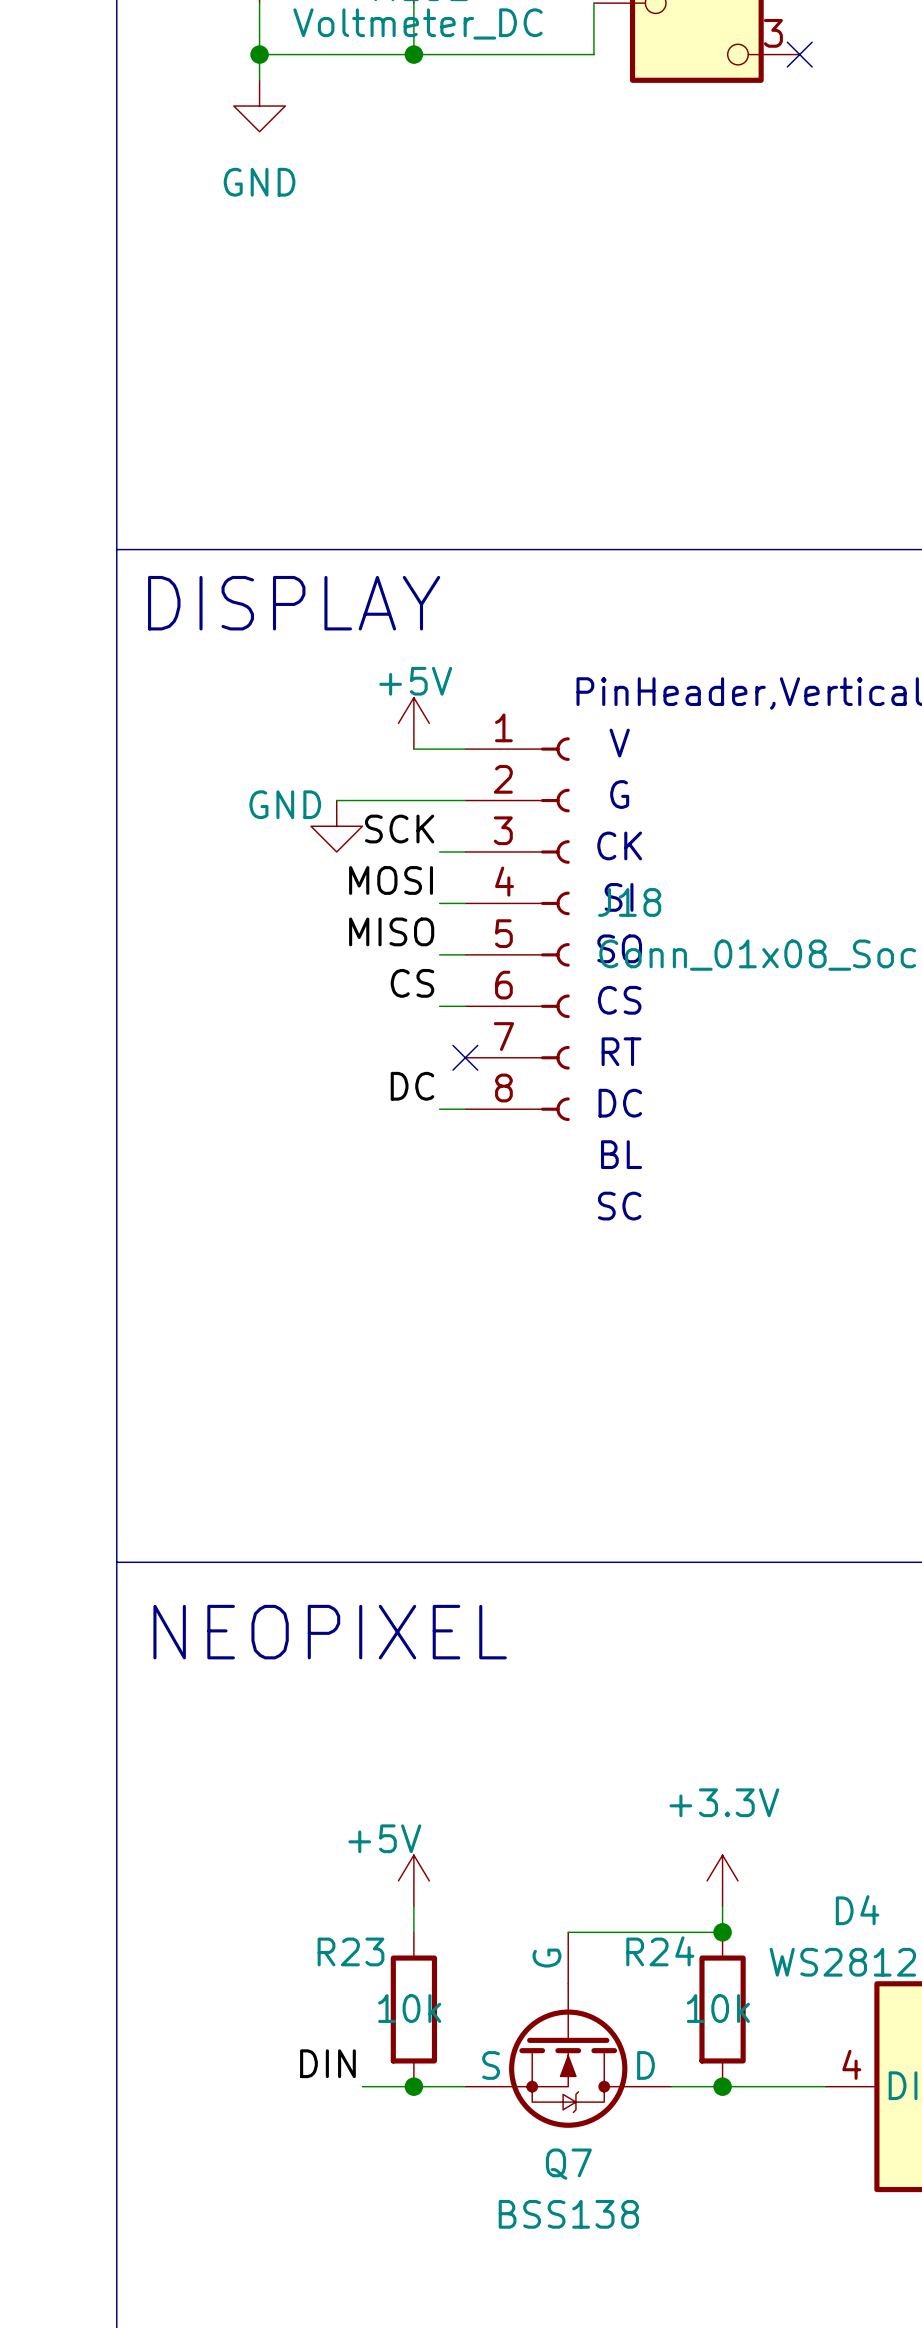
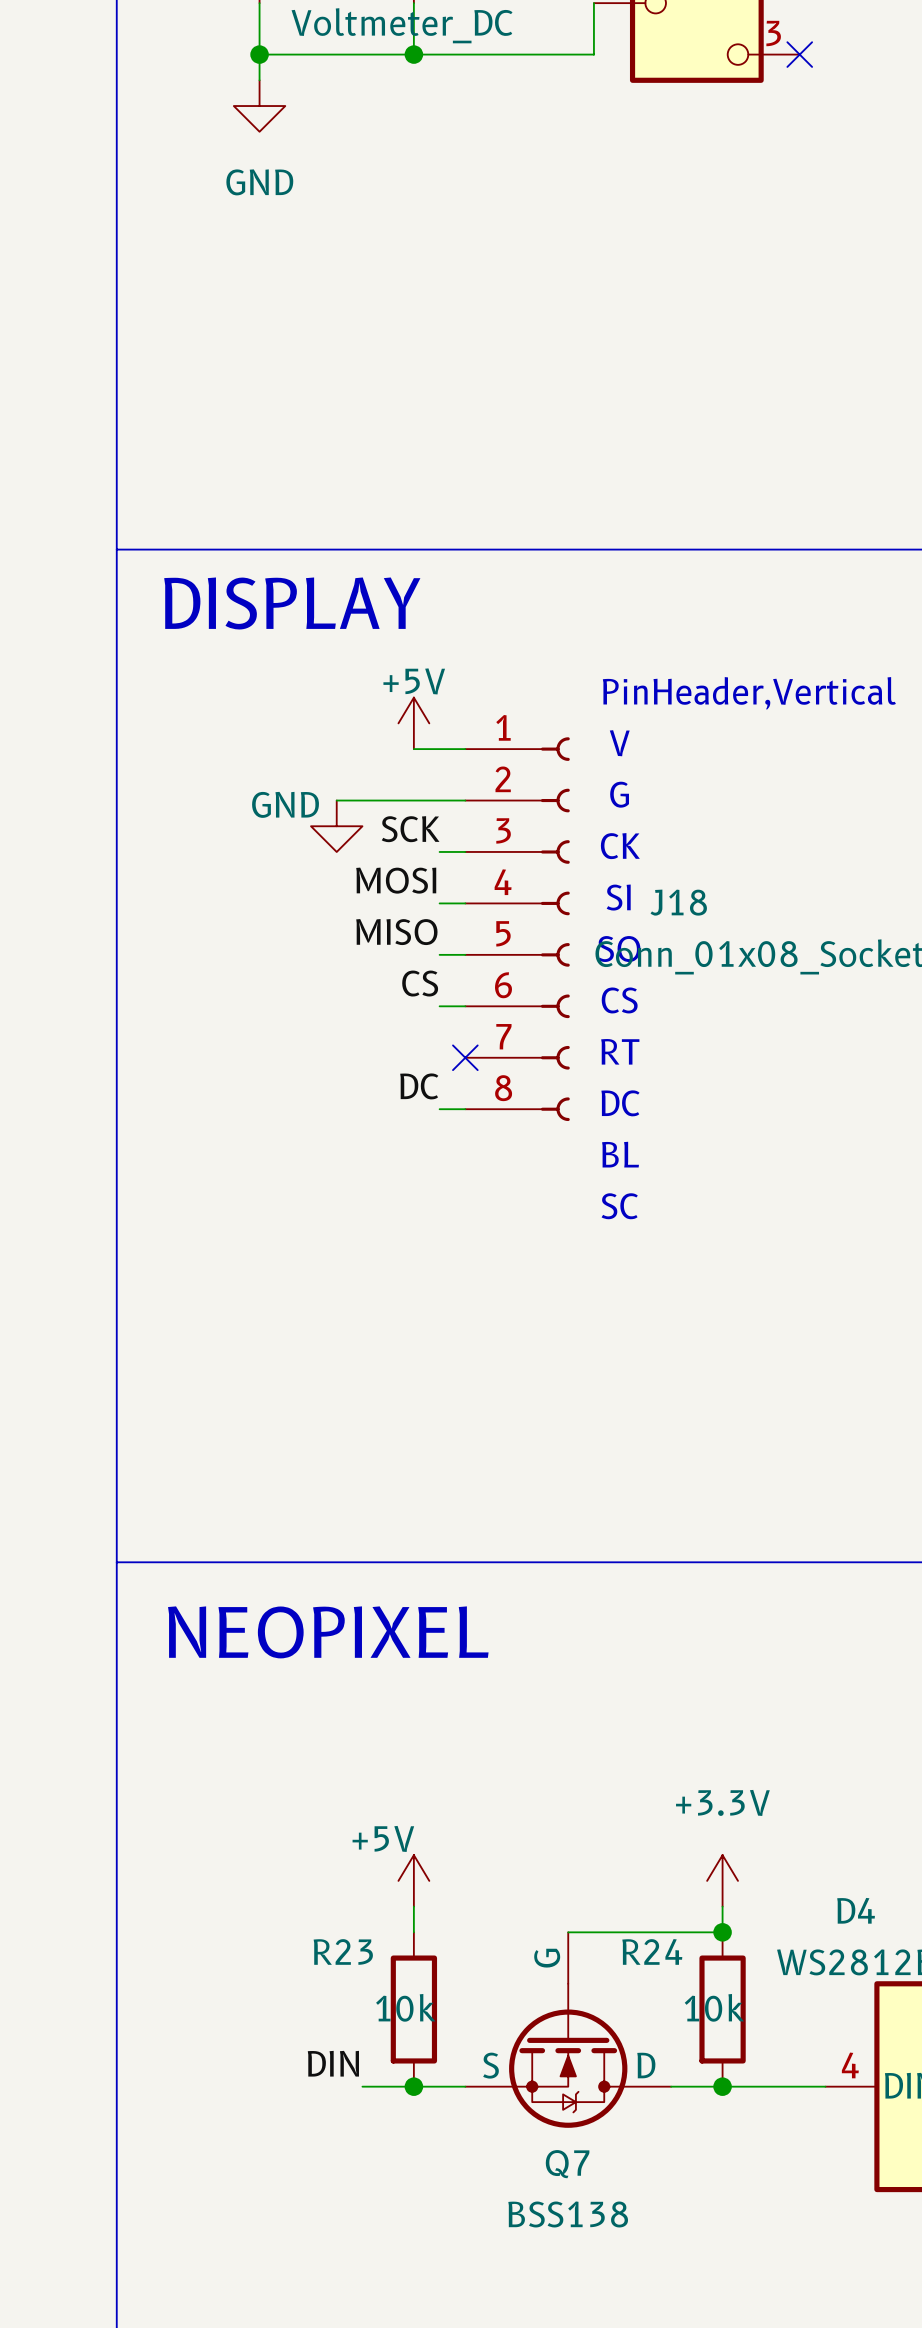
J18 name position: J18 (629, 902) -> J18 (678, 902)

